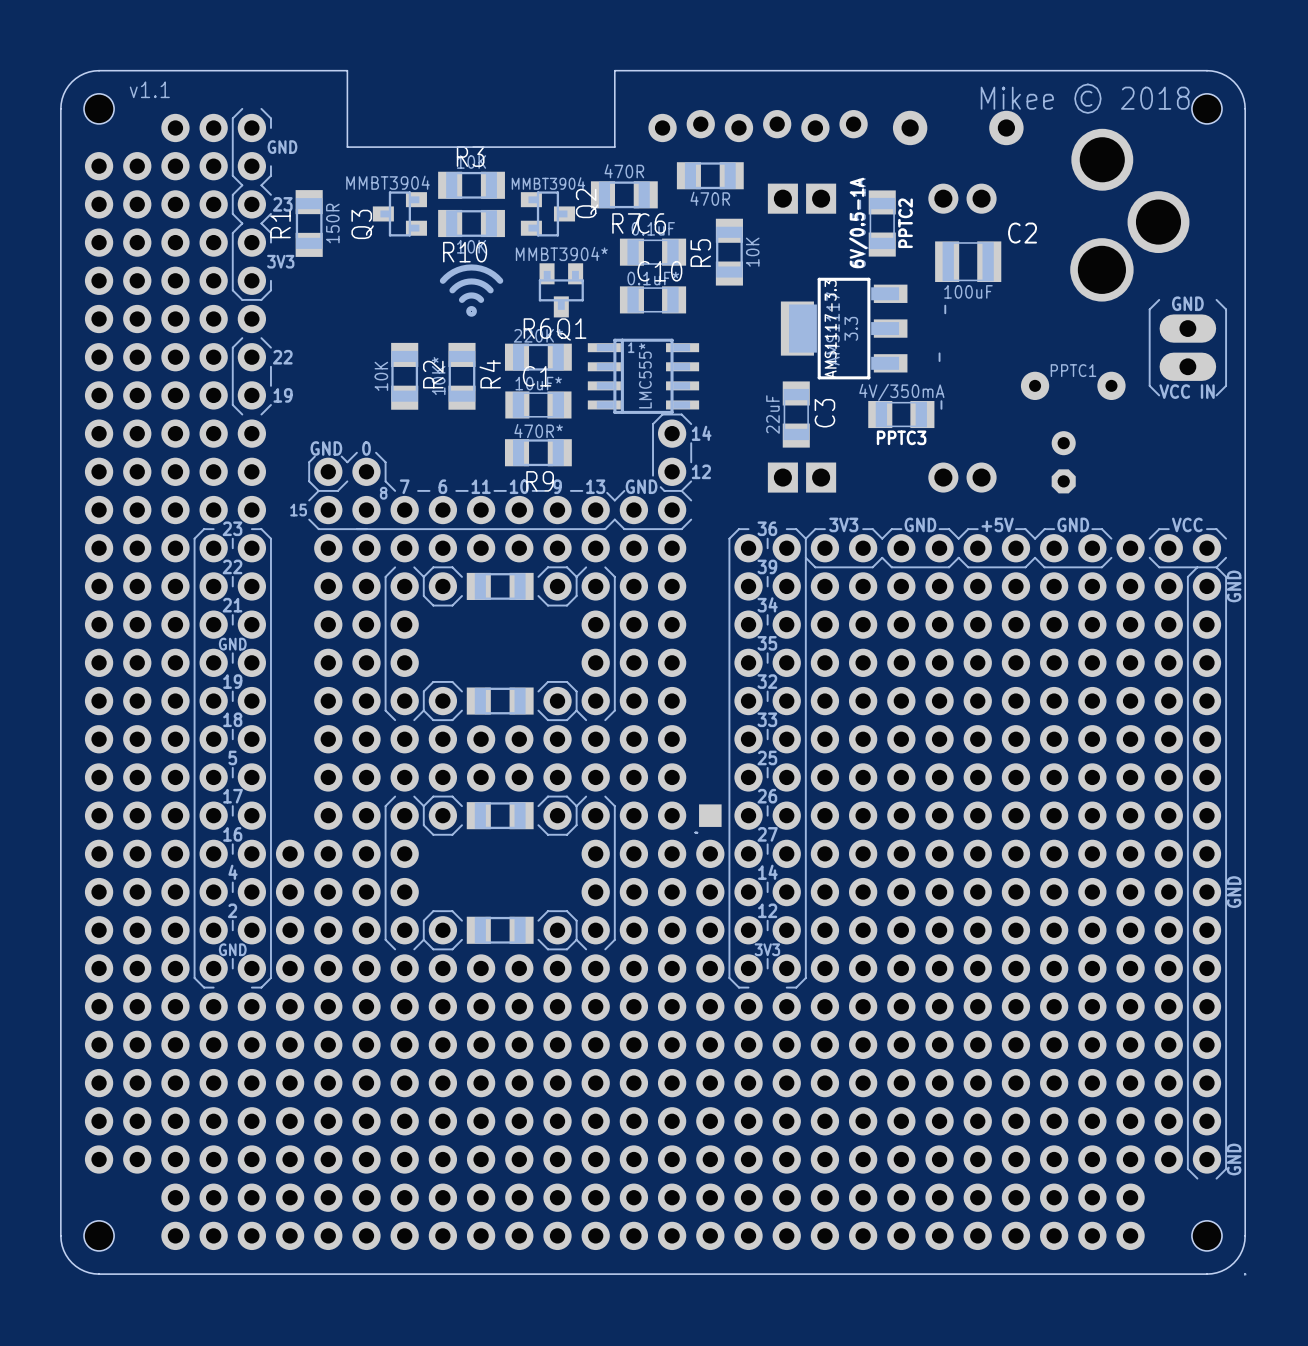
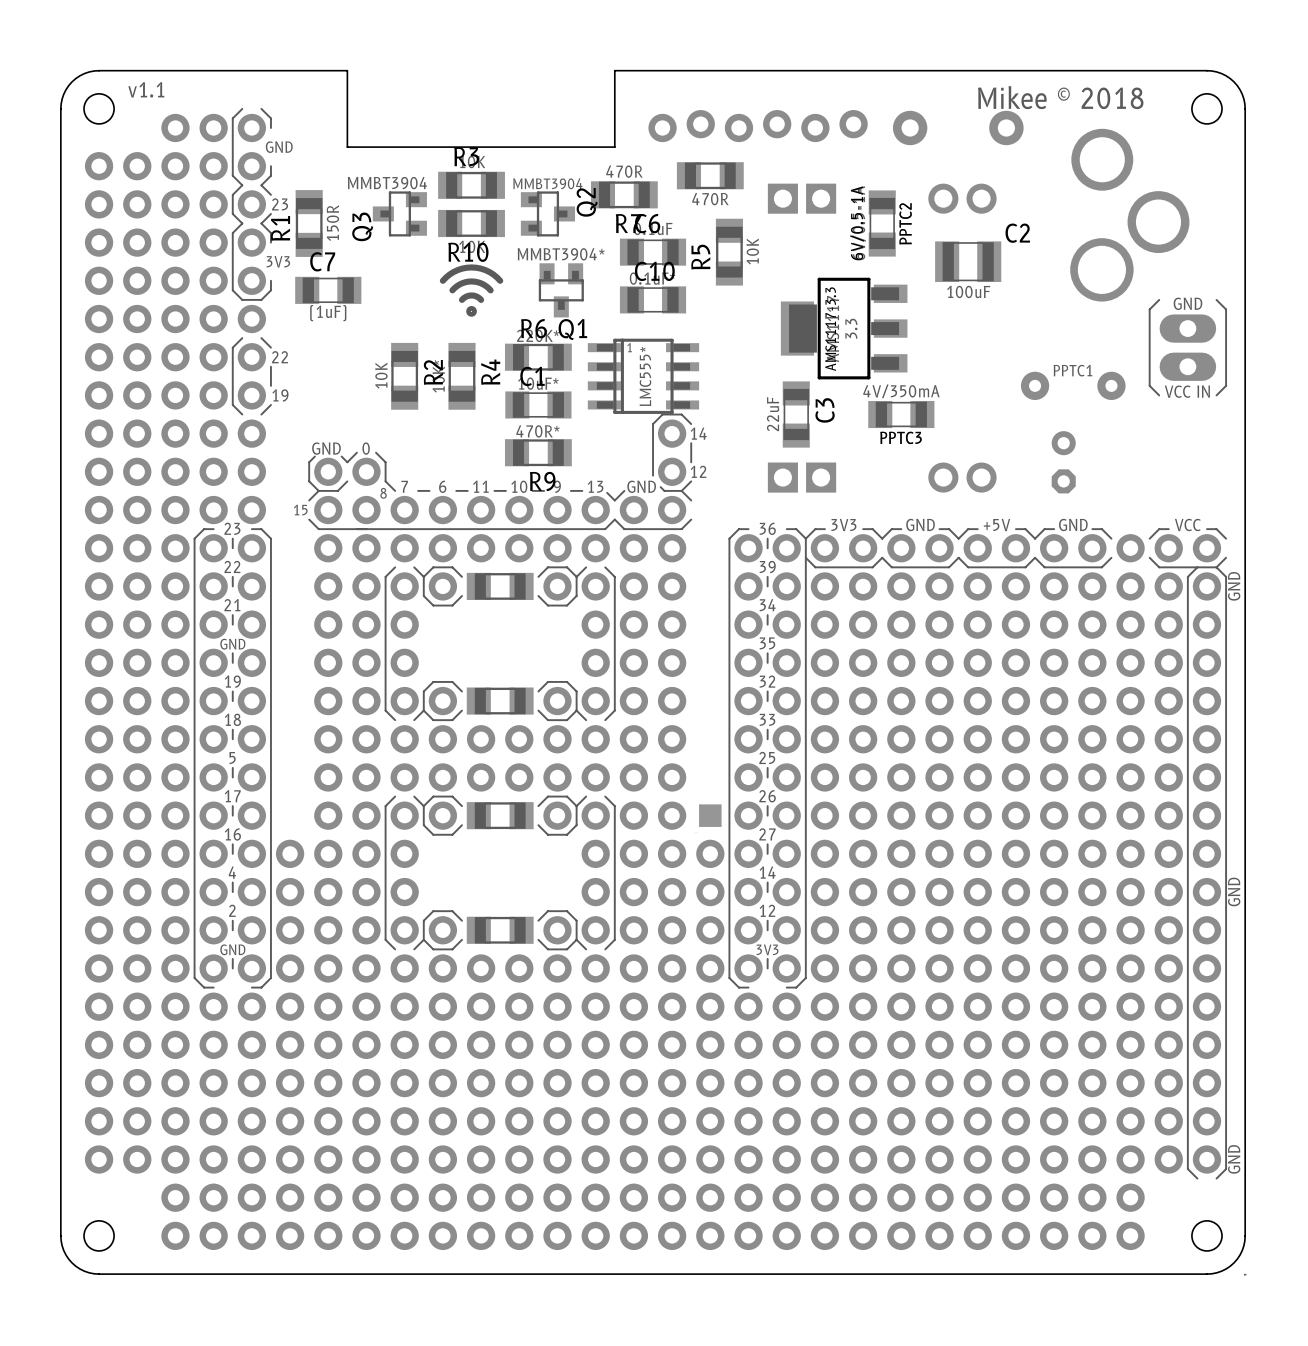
C7: none -> (1uF) (328, 290)
line: (945, 305) (945, 313) -> none
line: (939, 353) (939, 361) -> none
line: (941, 401) (941, 408) -> none

